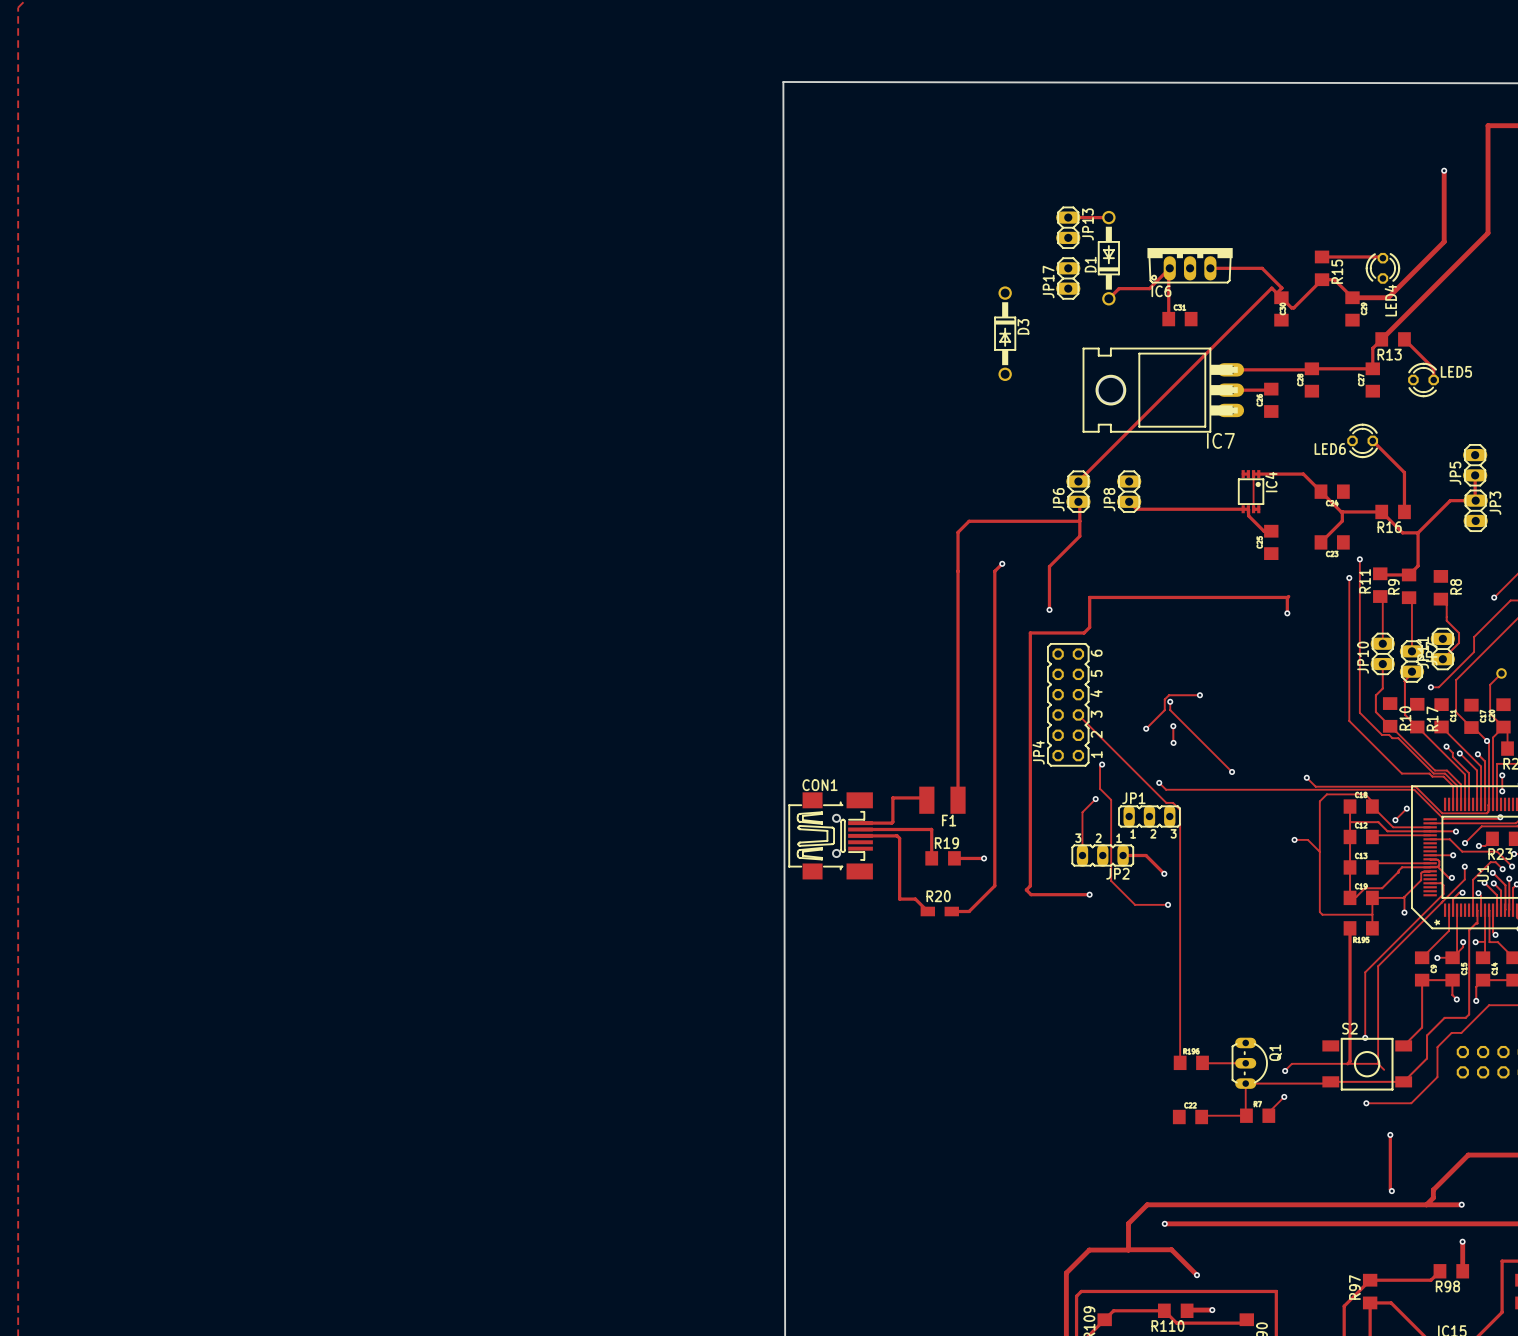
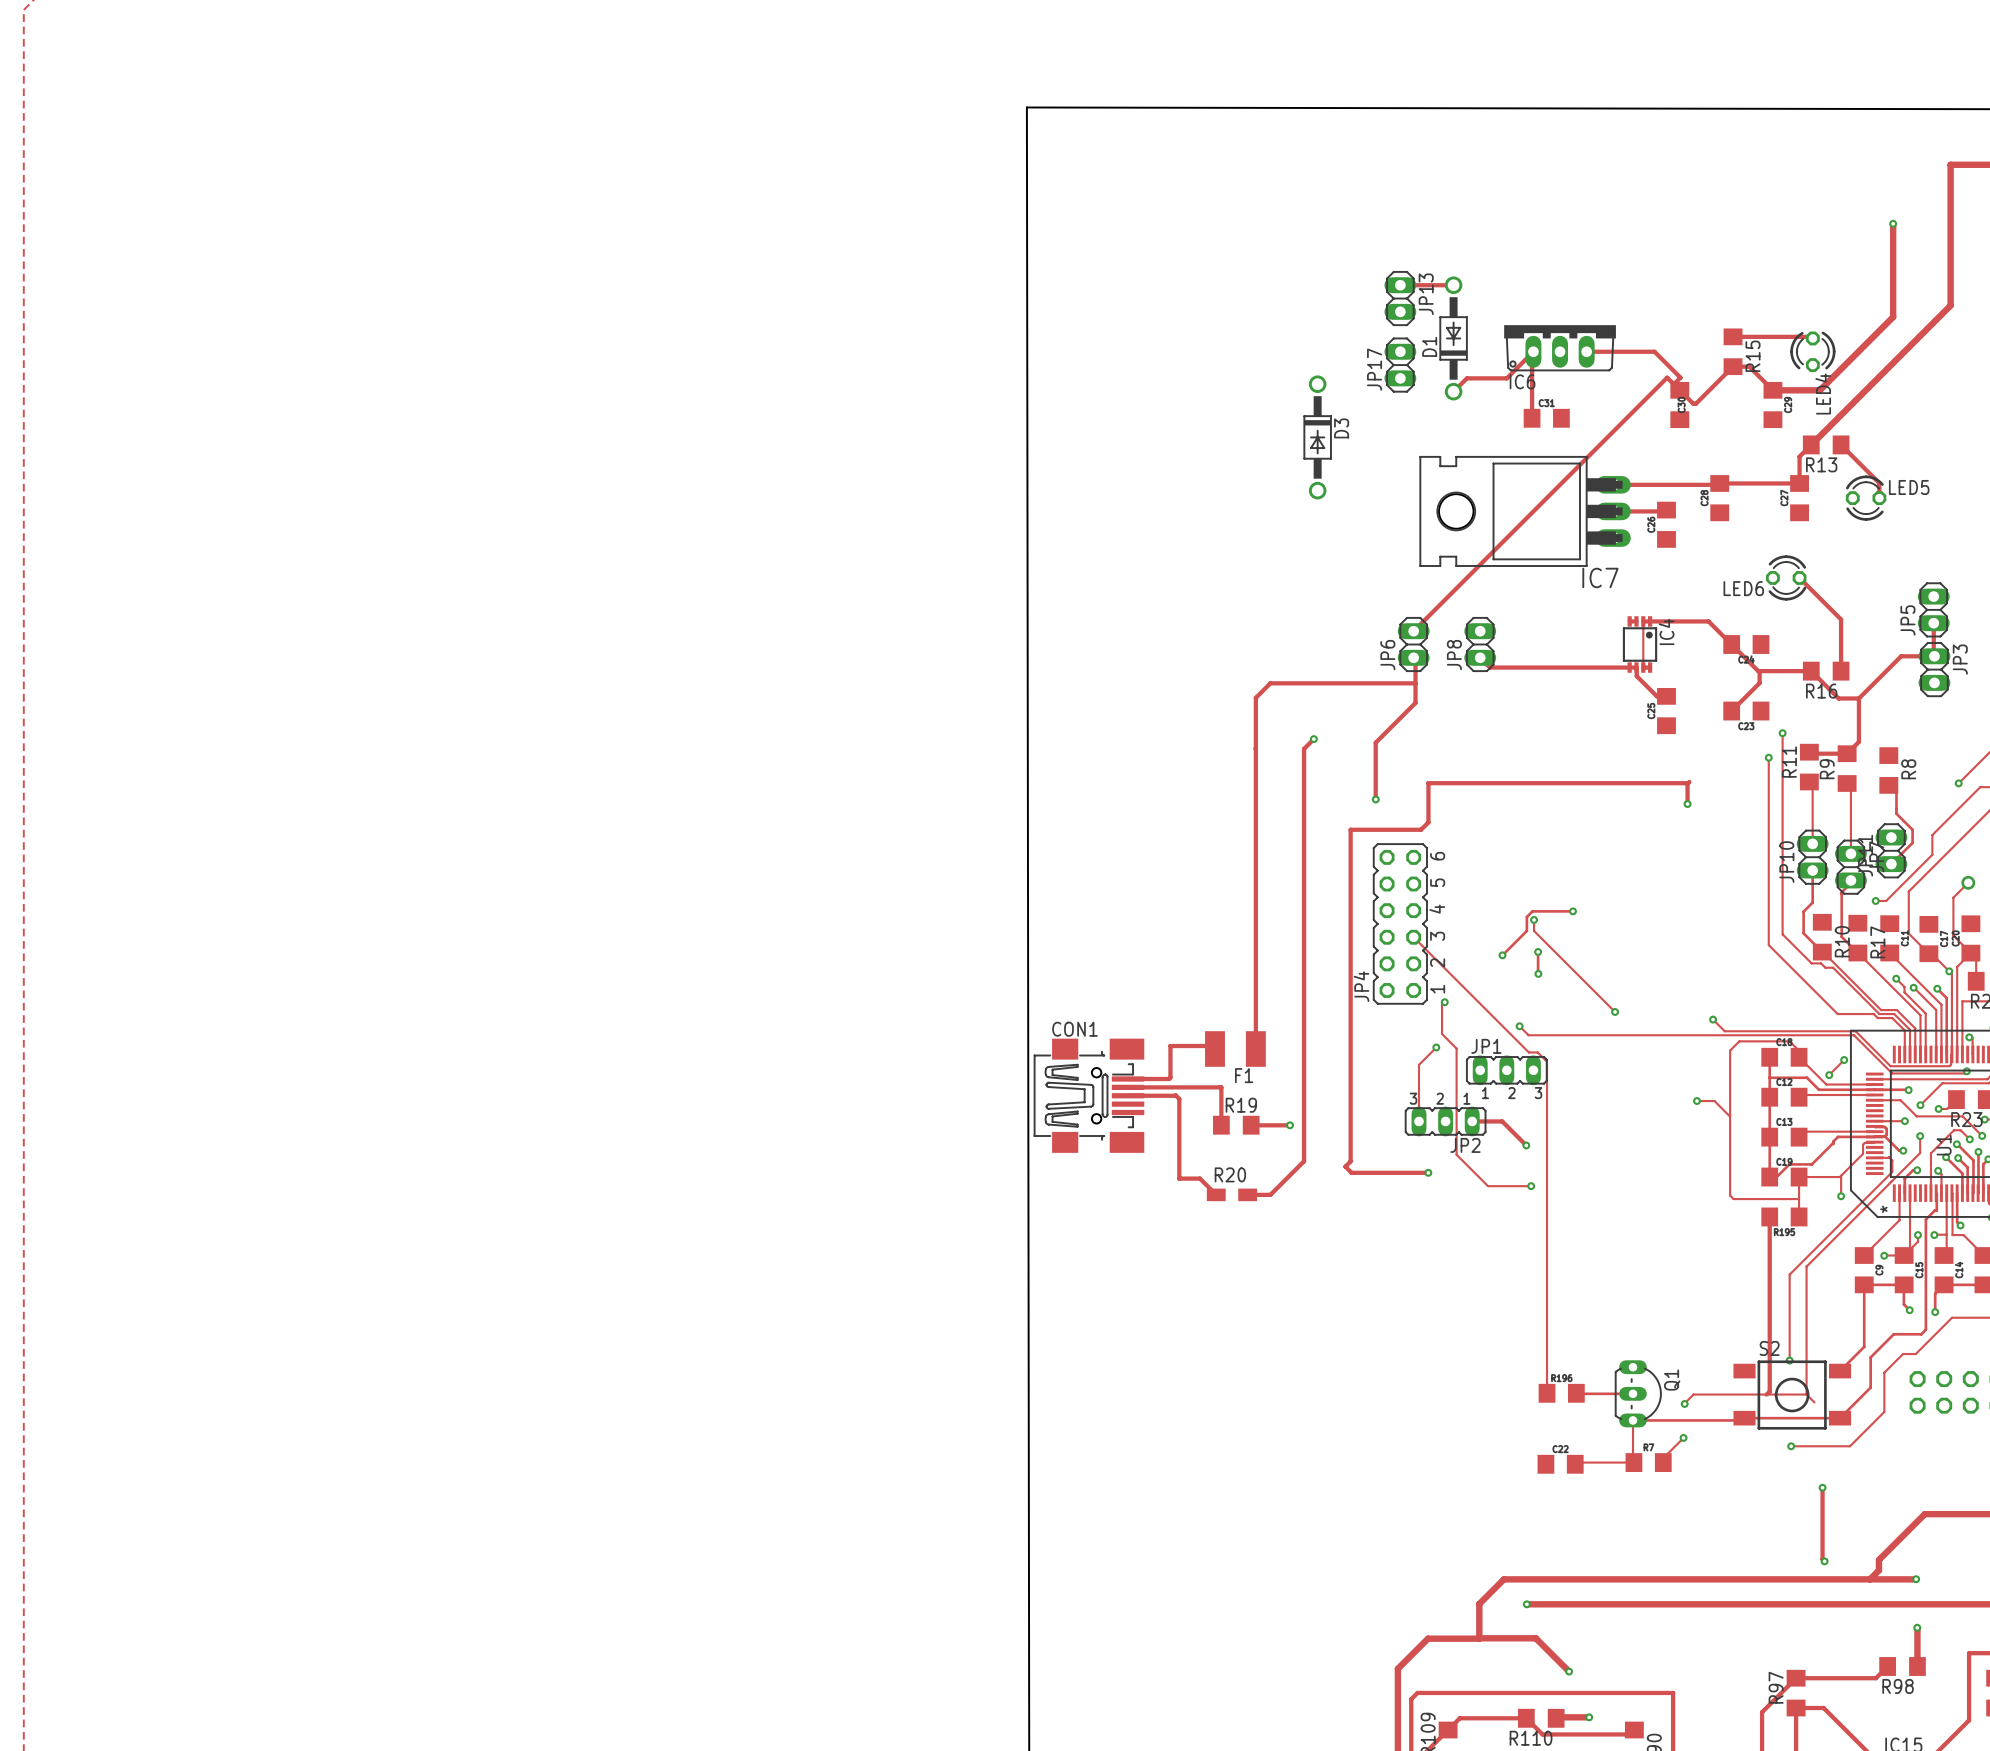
track: (1502, 775) (1502, 791) -> none
via: (1502, 775) -> none
track: none -> (1972, 1037) (1972, 1054)

